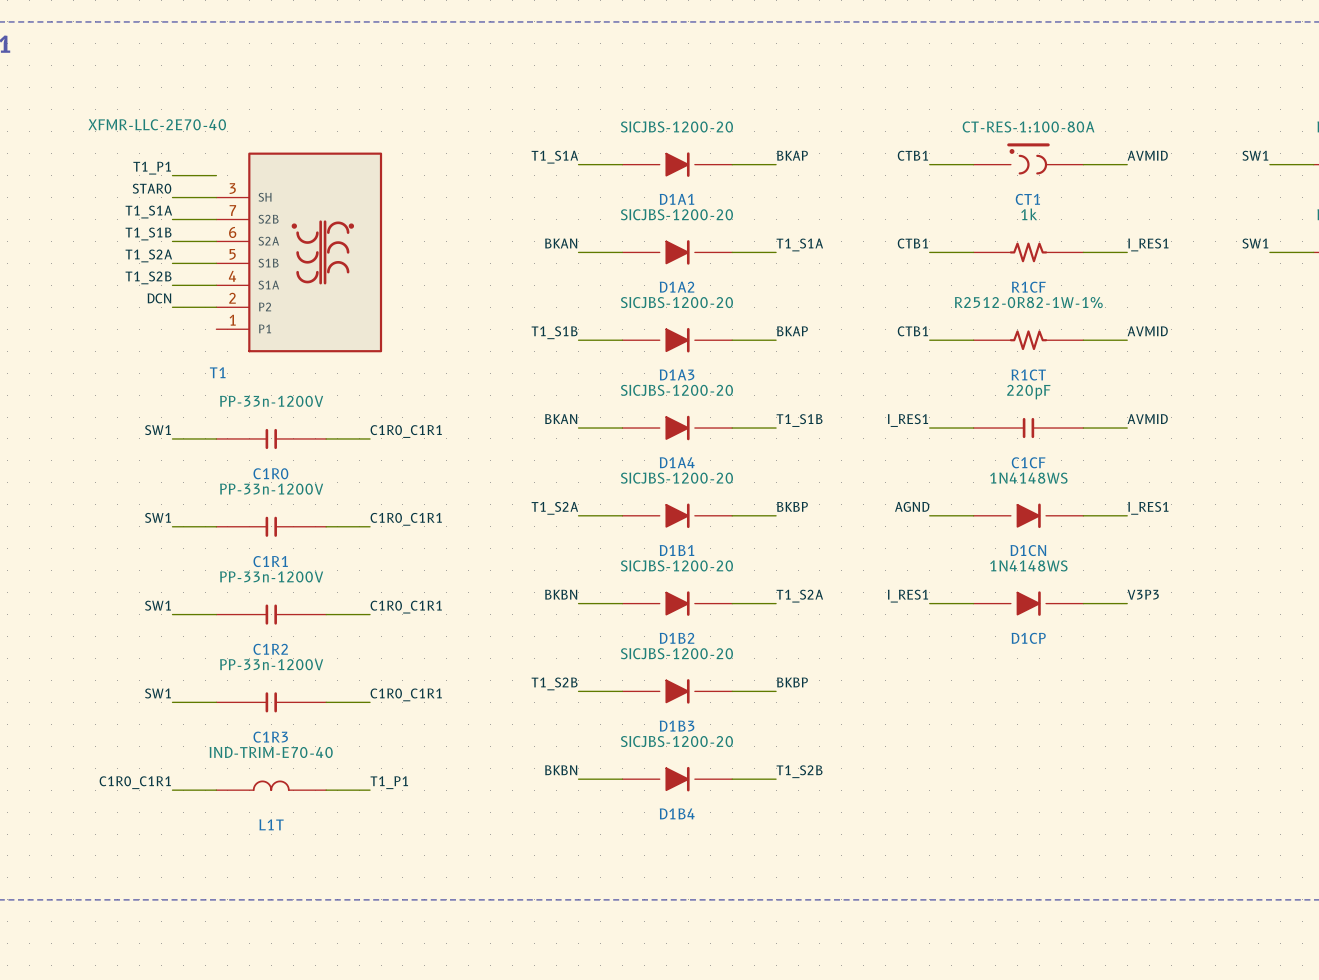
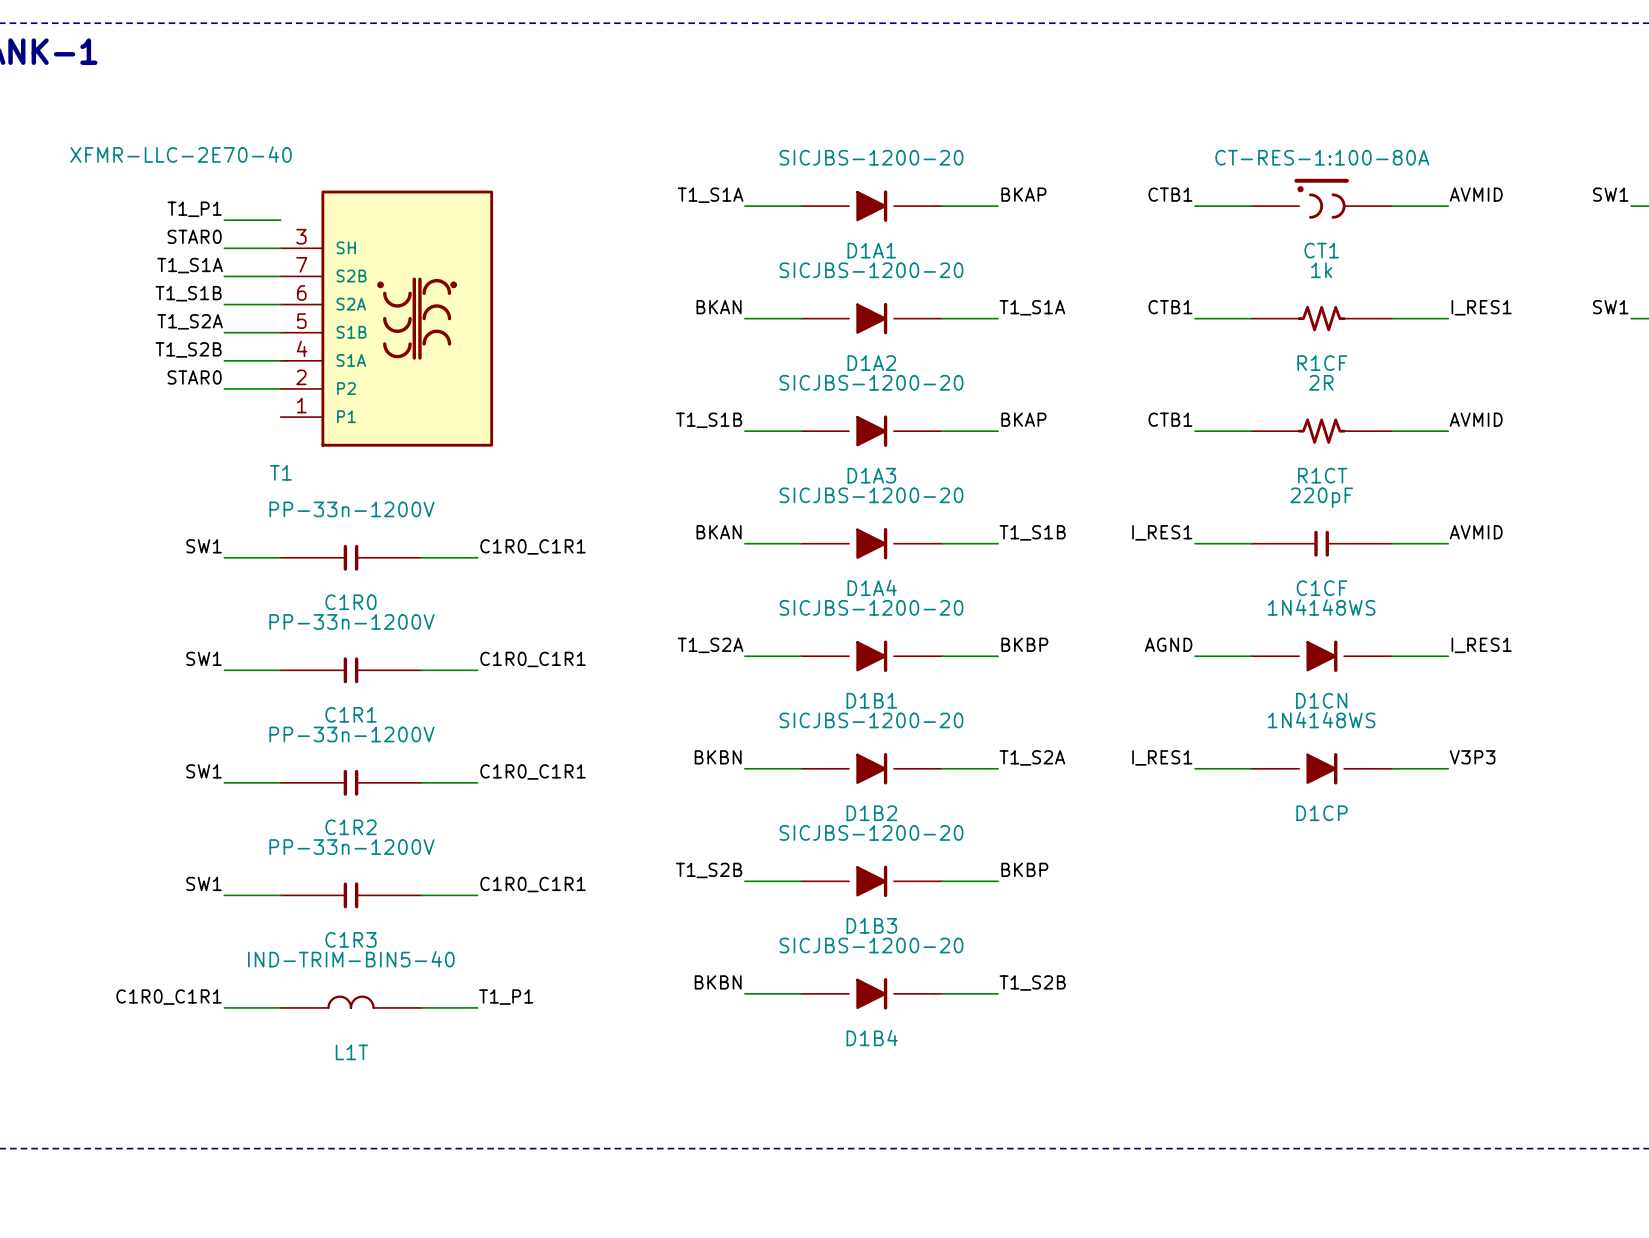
label: DCN (159, 298) -> STAR0 (194, 377)
R1CT value: R2512-0R82-1W-1% (1028, 302) -> 2R (1321, 382)
L1T value: IND-TRIM-E70-40 (271, 752) -> IND-TRIM-BIN5-40 (351, 959)

